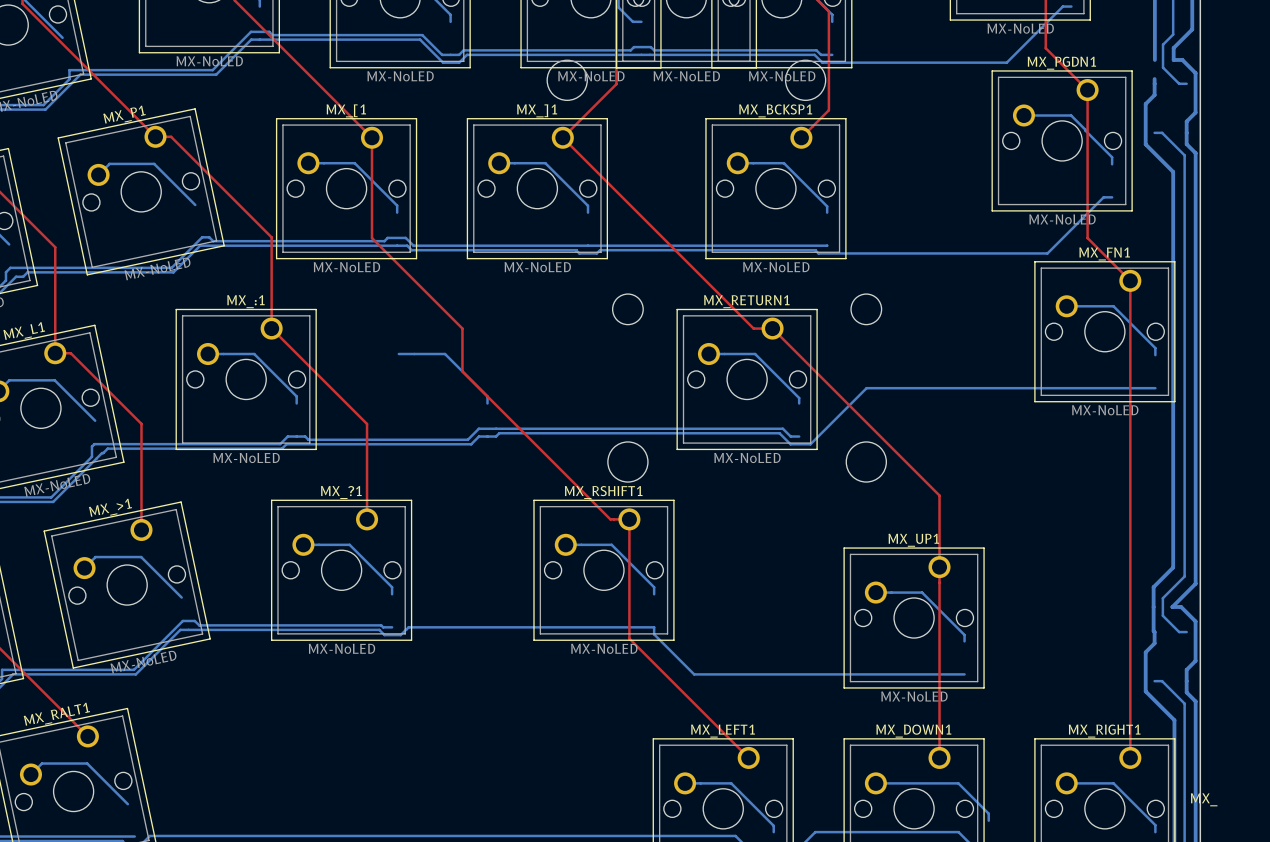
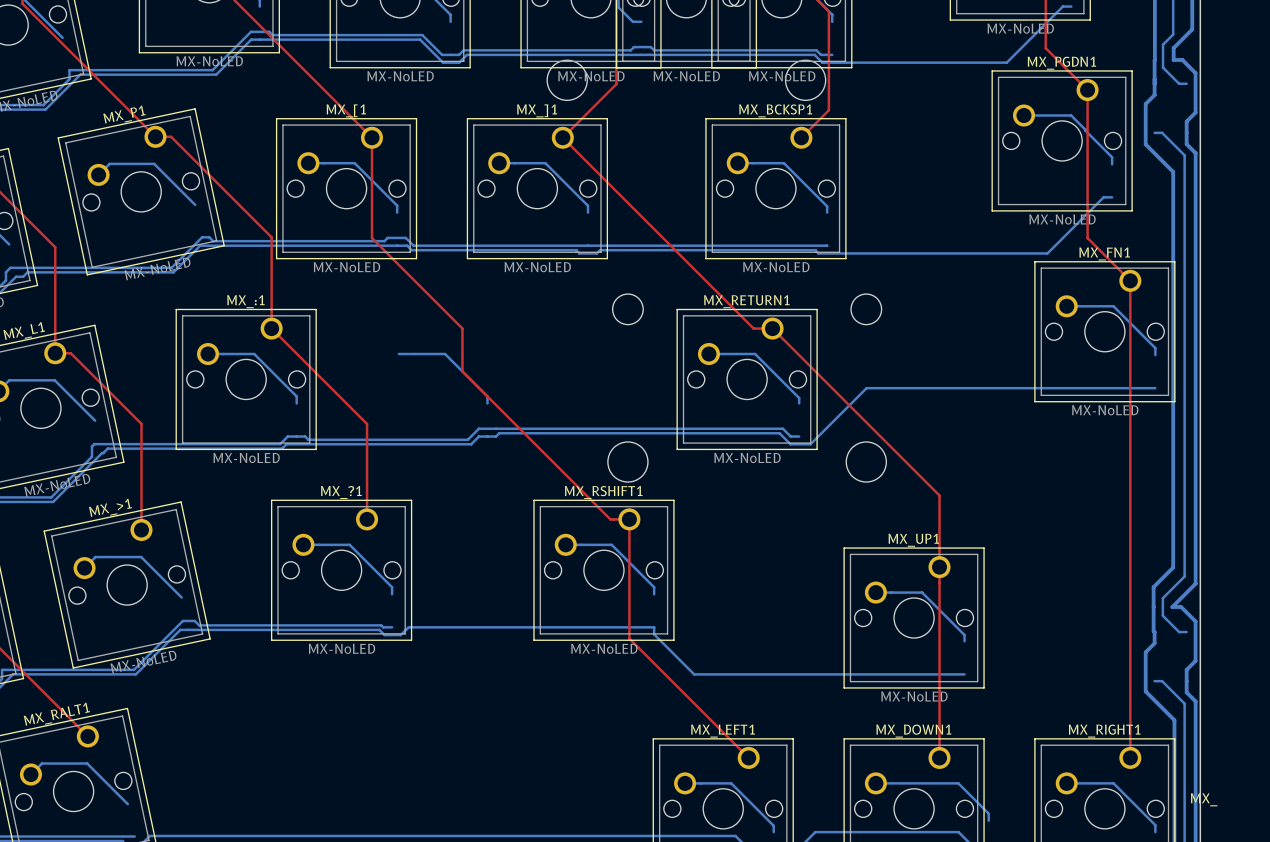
bottom track: none -> (1154, 59) (1154, 79)

